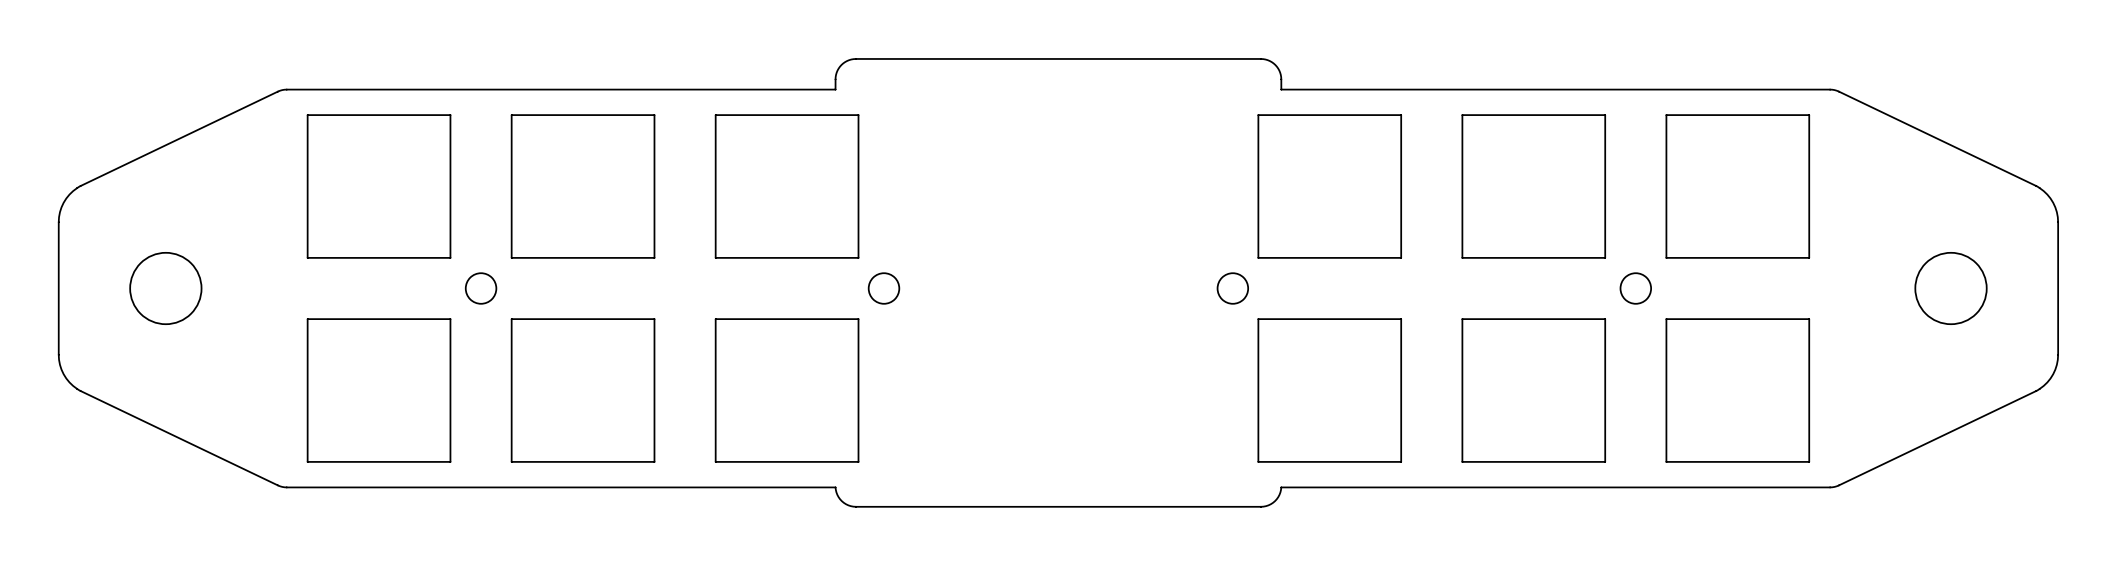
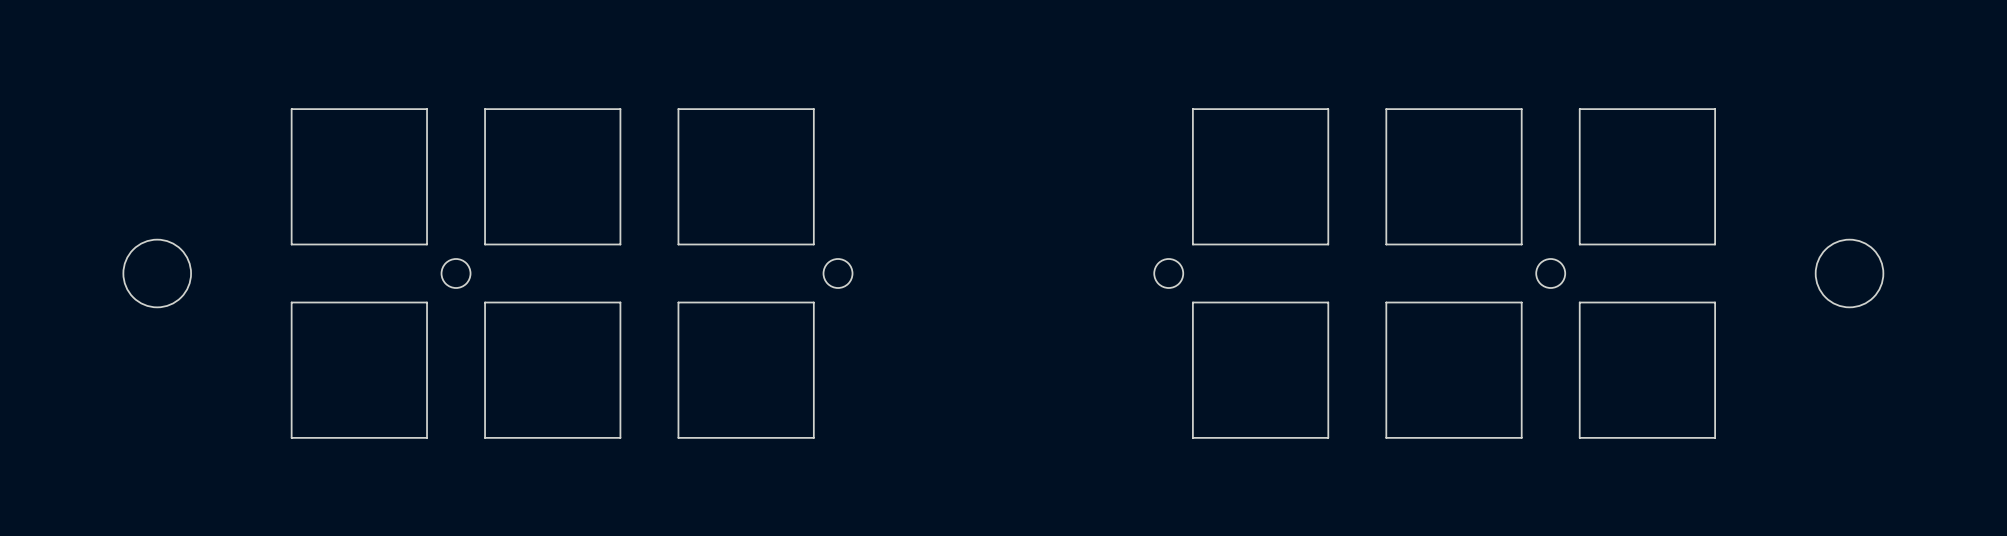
board edge: (1260, 58) (853, 59) (845, 62) (838, 68) (835, 77) (835, 89) (282, 90) (80, 186) (66, 198) (61, 207) (58, 222) (59, 364) (66, 378) (78, 390) (282, 486) (835, 487) (841, 501) (855, 506) (1260, 506) (1274, 501) (1281, 487) (1832, 487) (2036, 390) (2047, 382) (2055, 369) (2058, 354) (2058, 222) (2056, 212) (2050, 198) (2036, 186) (1836, 90) (1281, 89) (1281, 77) (1278, 68) (1271, 62) (1260, 58) -> none

